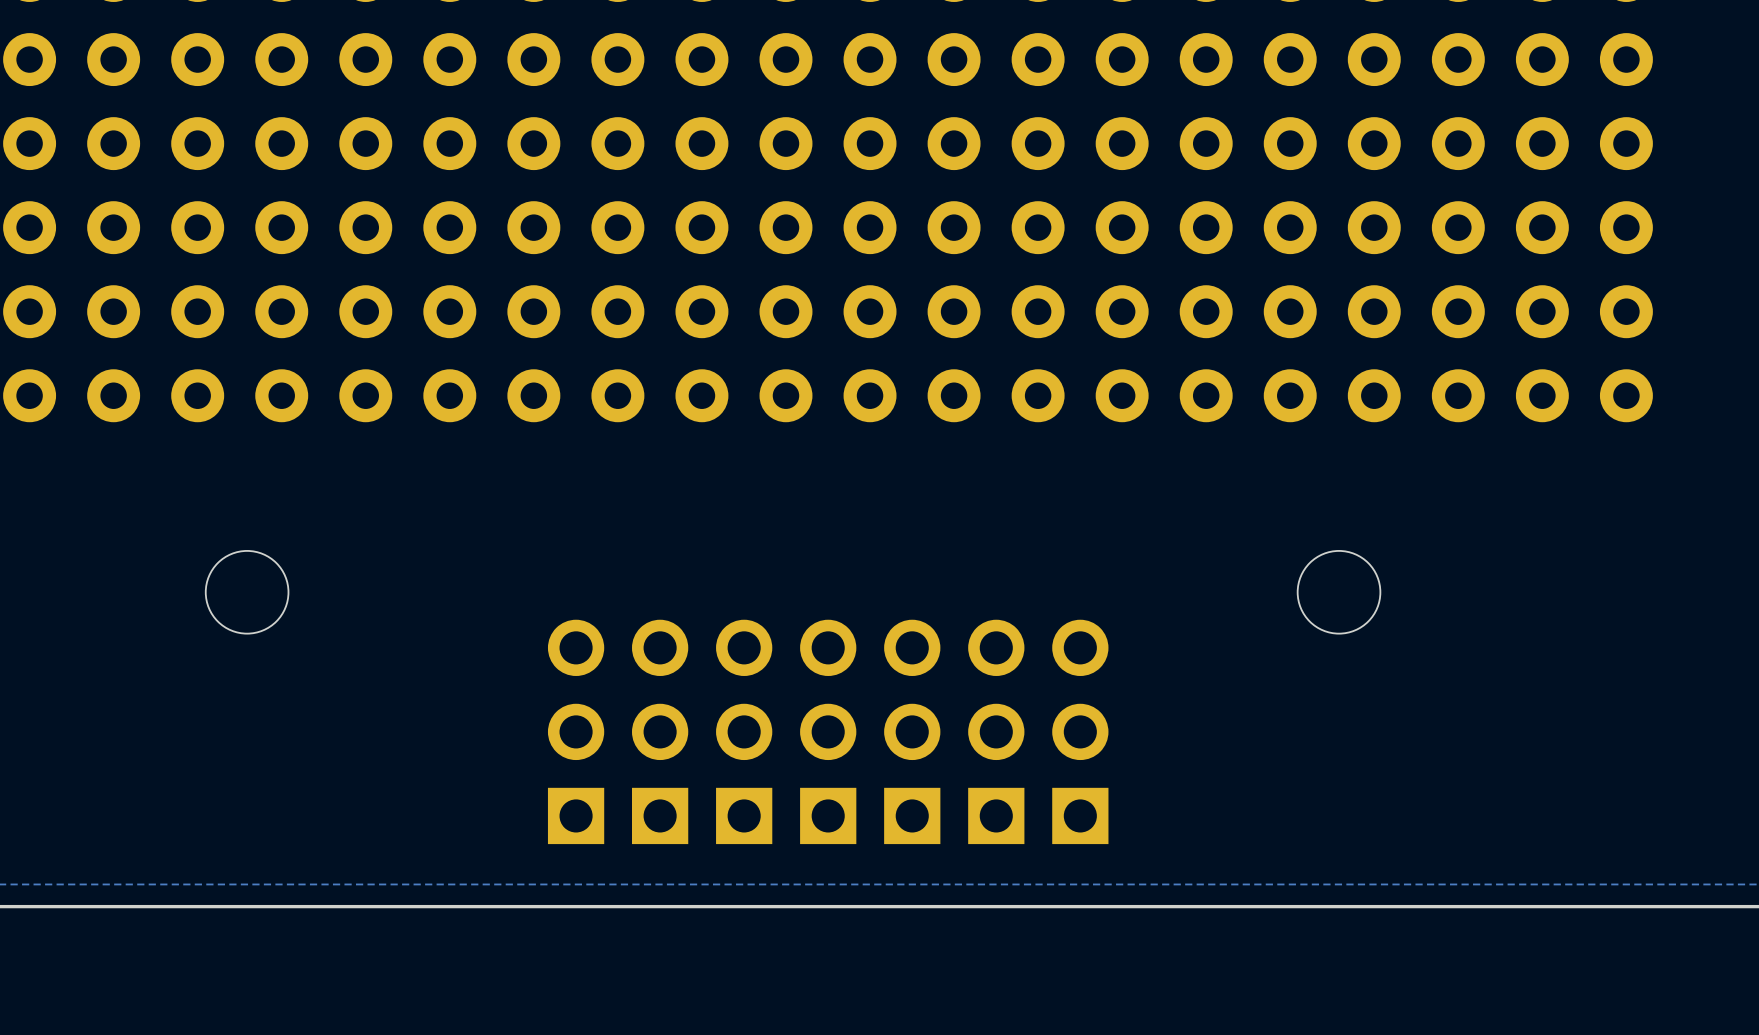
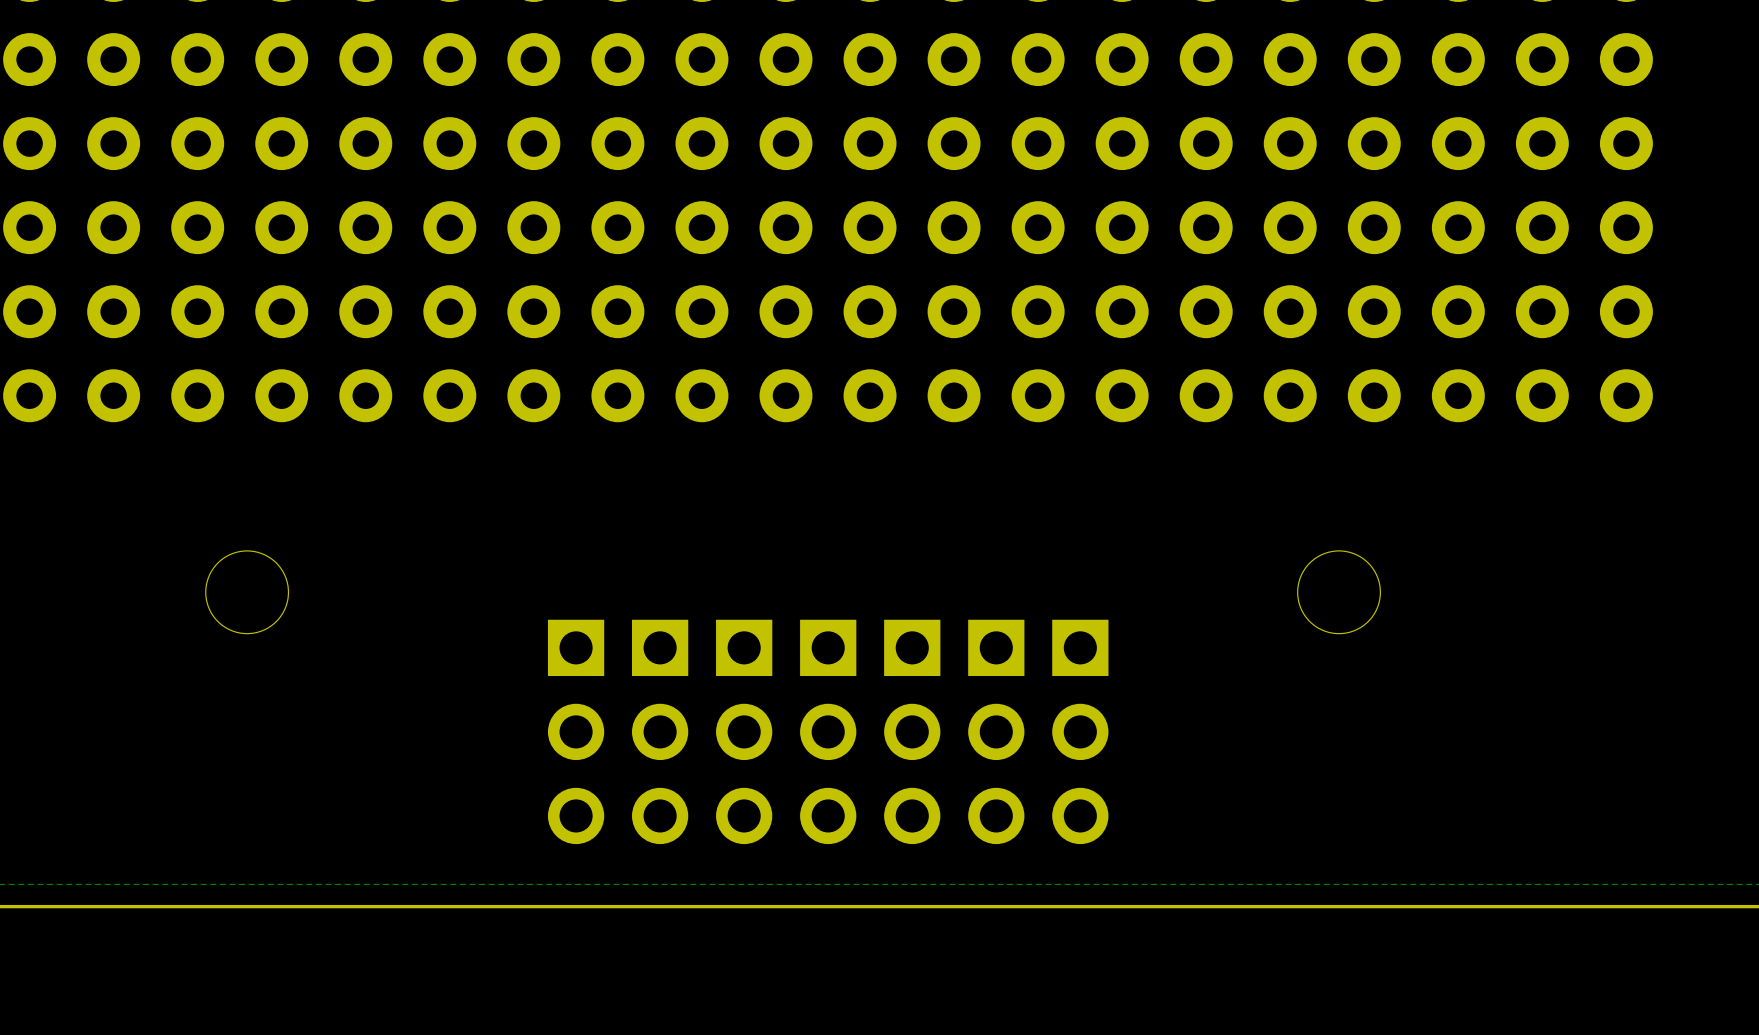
part rotation: 0° (576, 731) -> 180° (576, 731)
part rotation: 0° (660, 731) -> 180° (660, 731)
part rotation: 0° (744, 731) -> 180° (744, 731)
part rotation: 0° (828, 731) -> 180° (828, 731)
part rotation: 0° (912, 731) -> 180° (912, 731)
part rotation: 0° (996, 731) -> 180° (996, 731)
part rotation: 0° (1080, 731) -> 180° (1080, 731)

